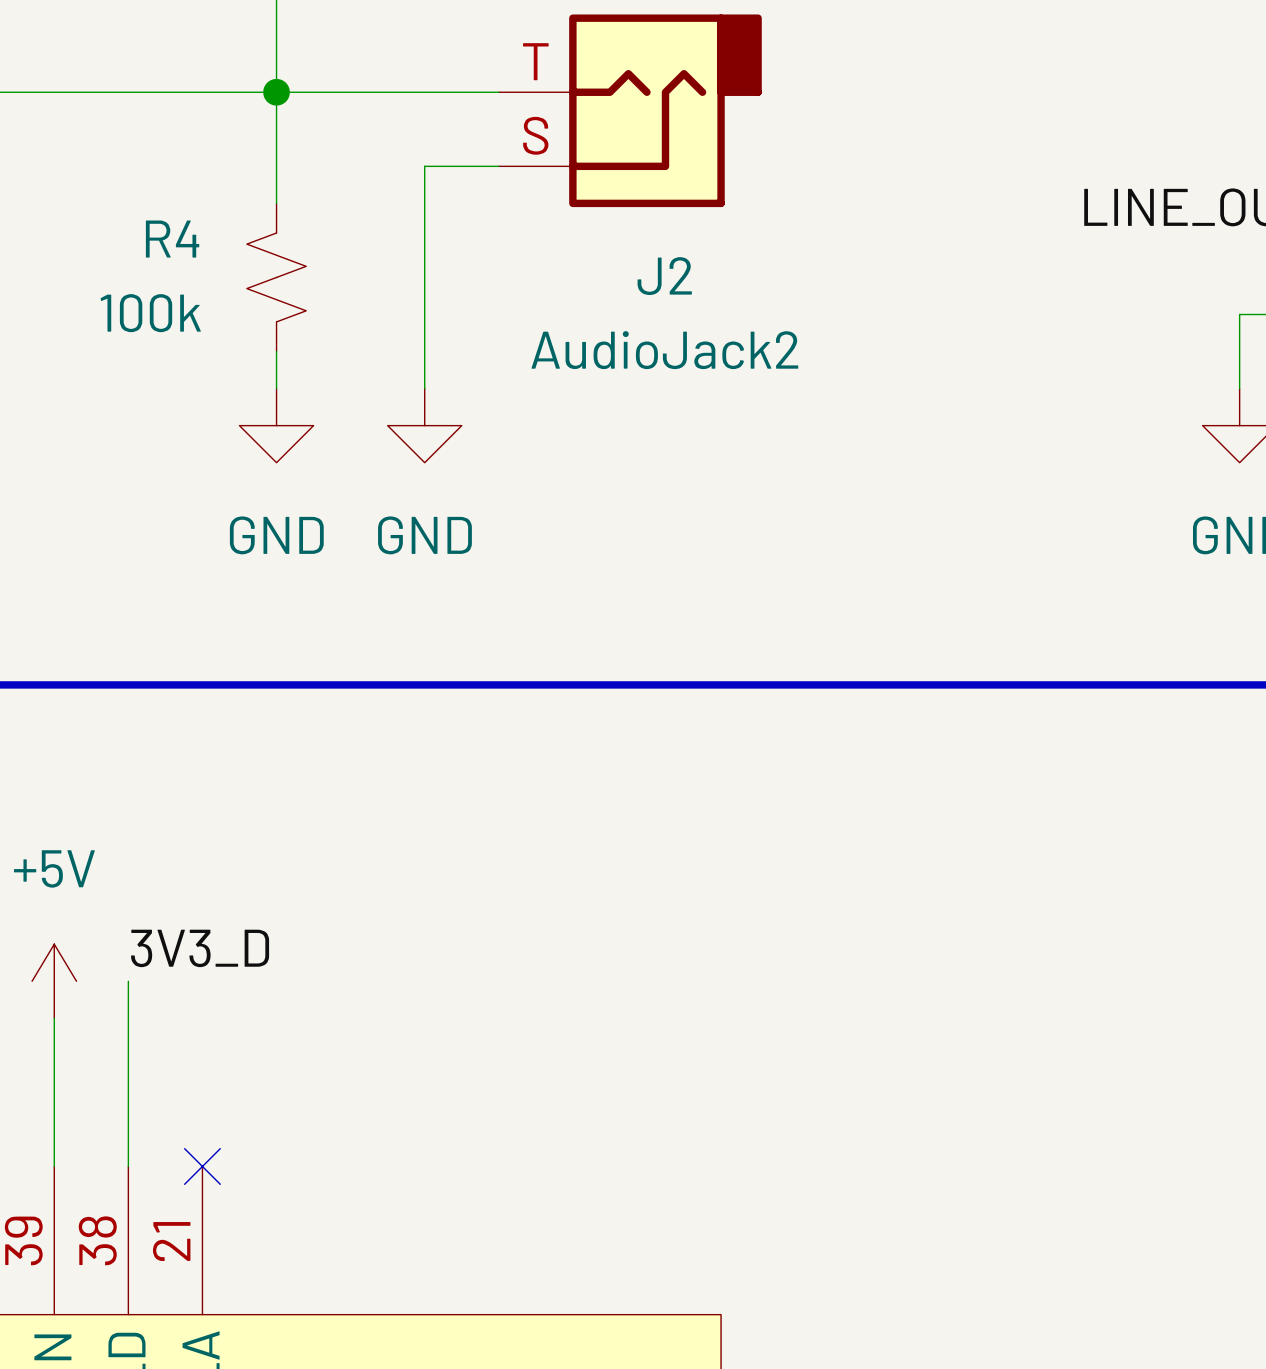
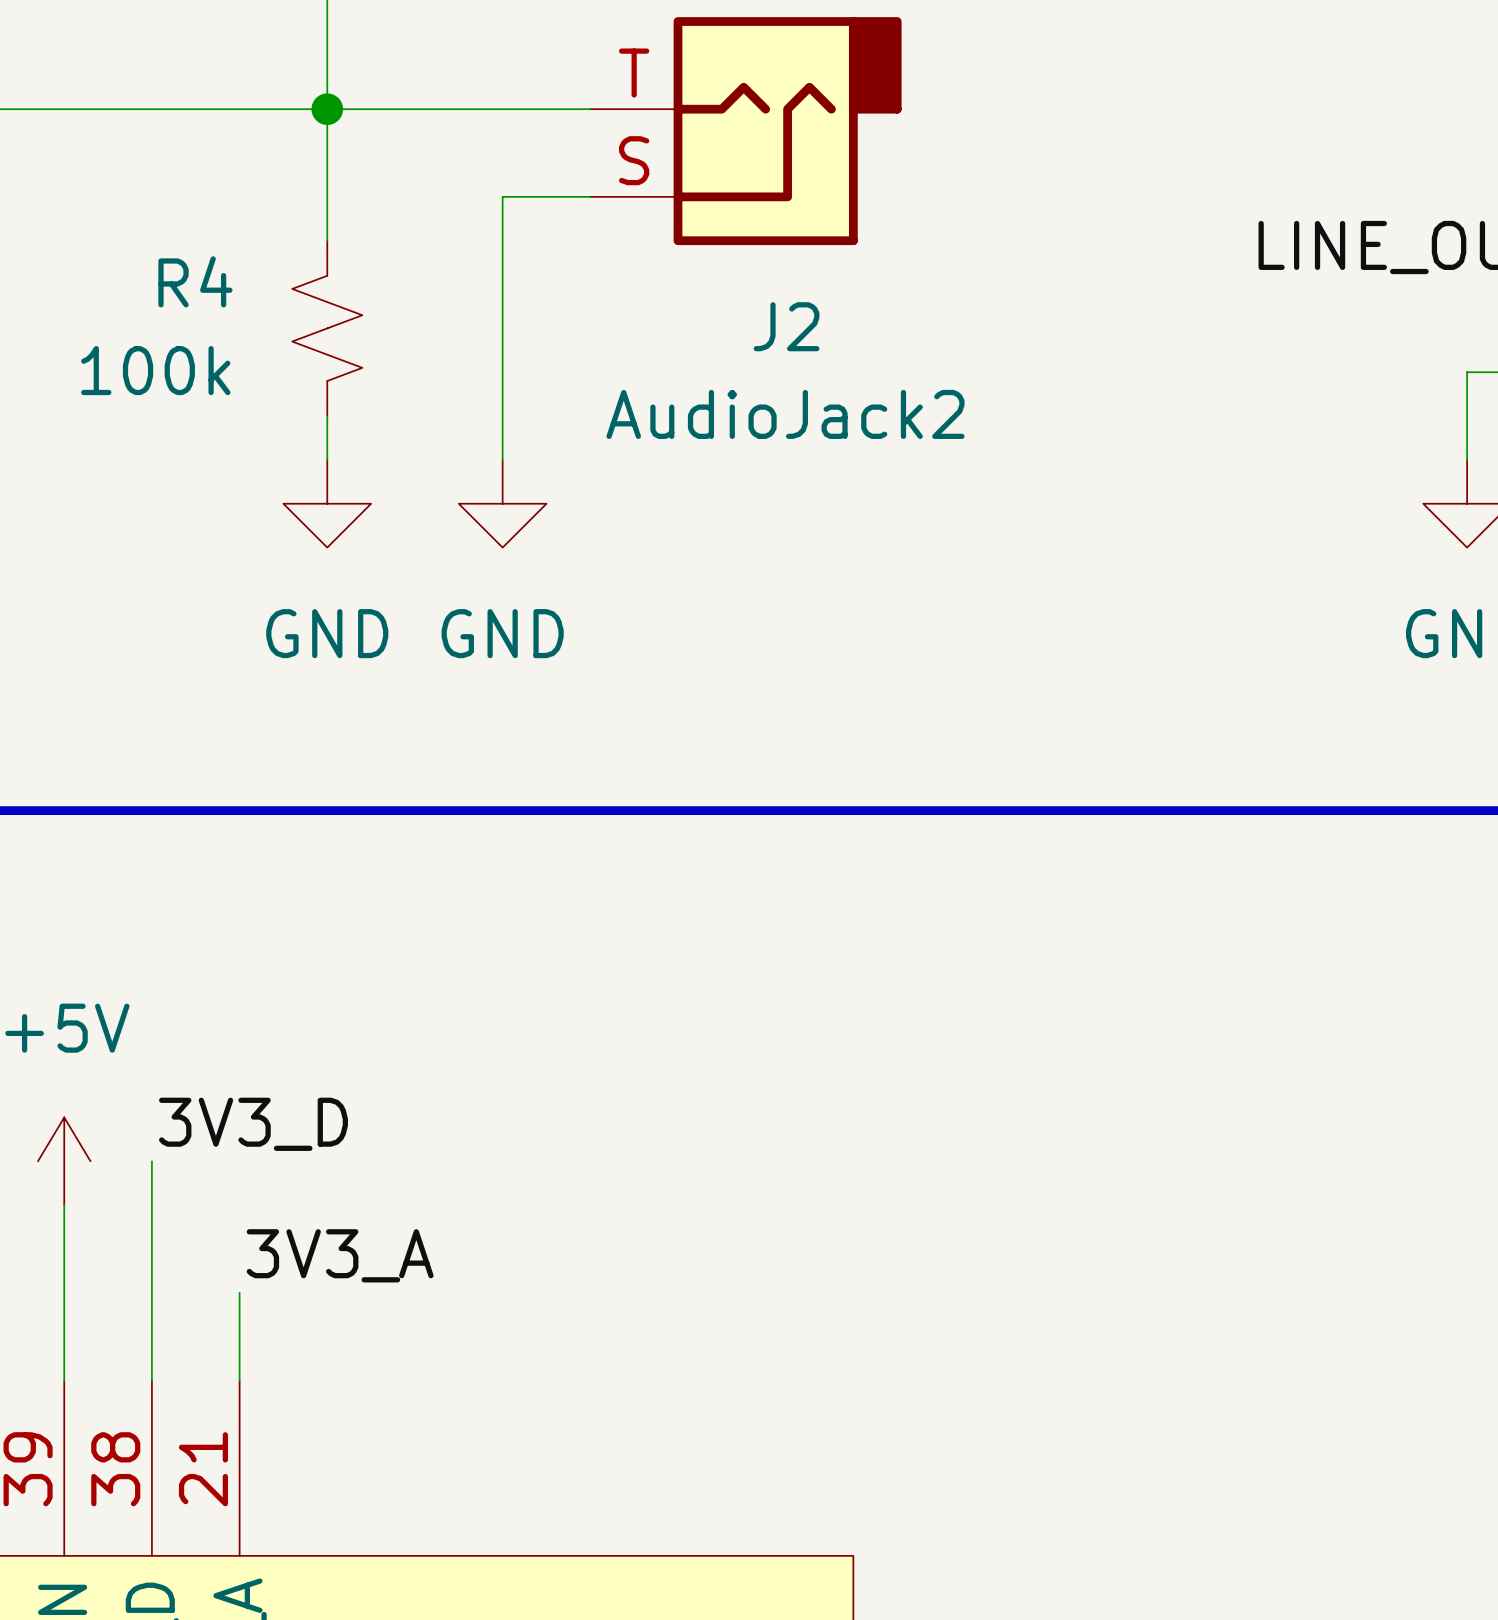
label: none -> 3V3_A (340, 1255)
wire: none -> (239, 1292) (239, 1380)
no-connect mark: (202, 1166) -> none

